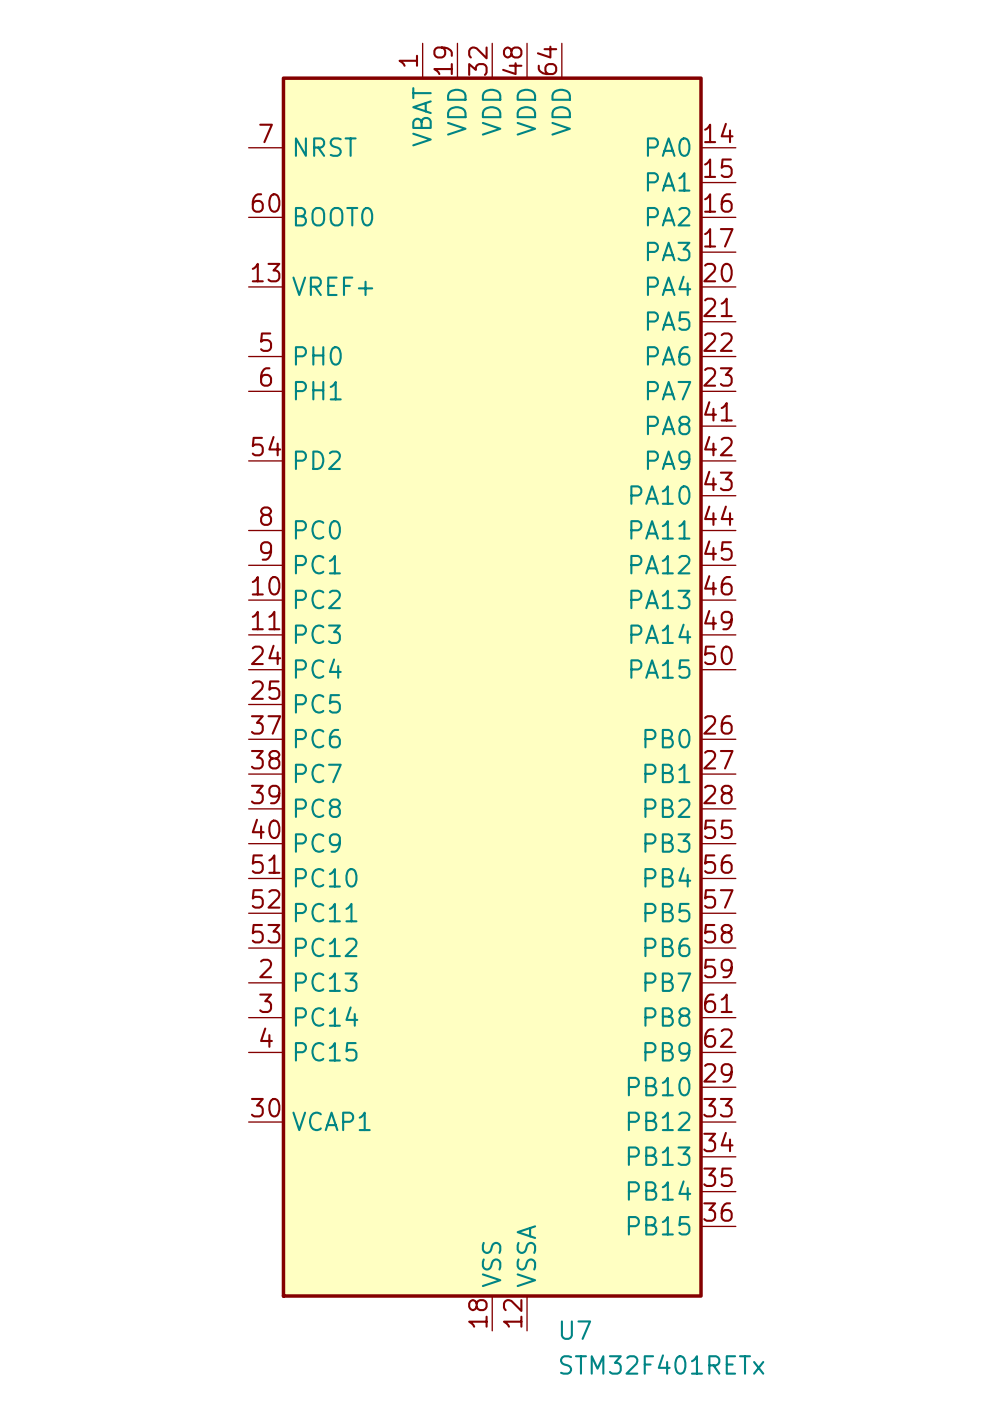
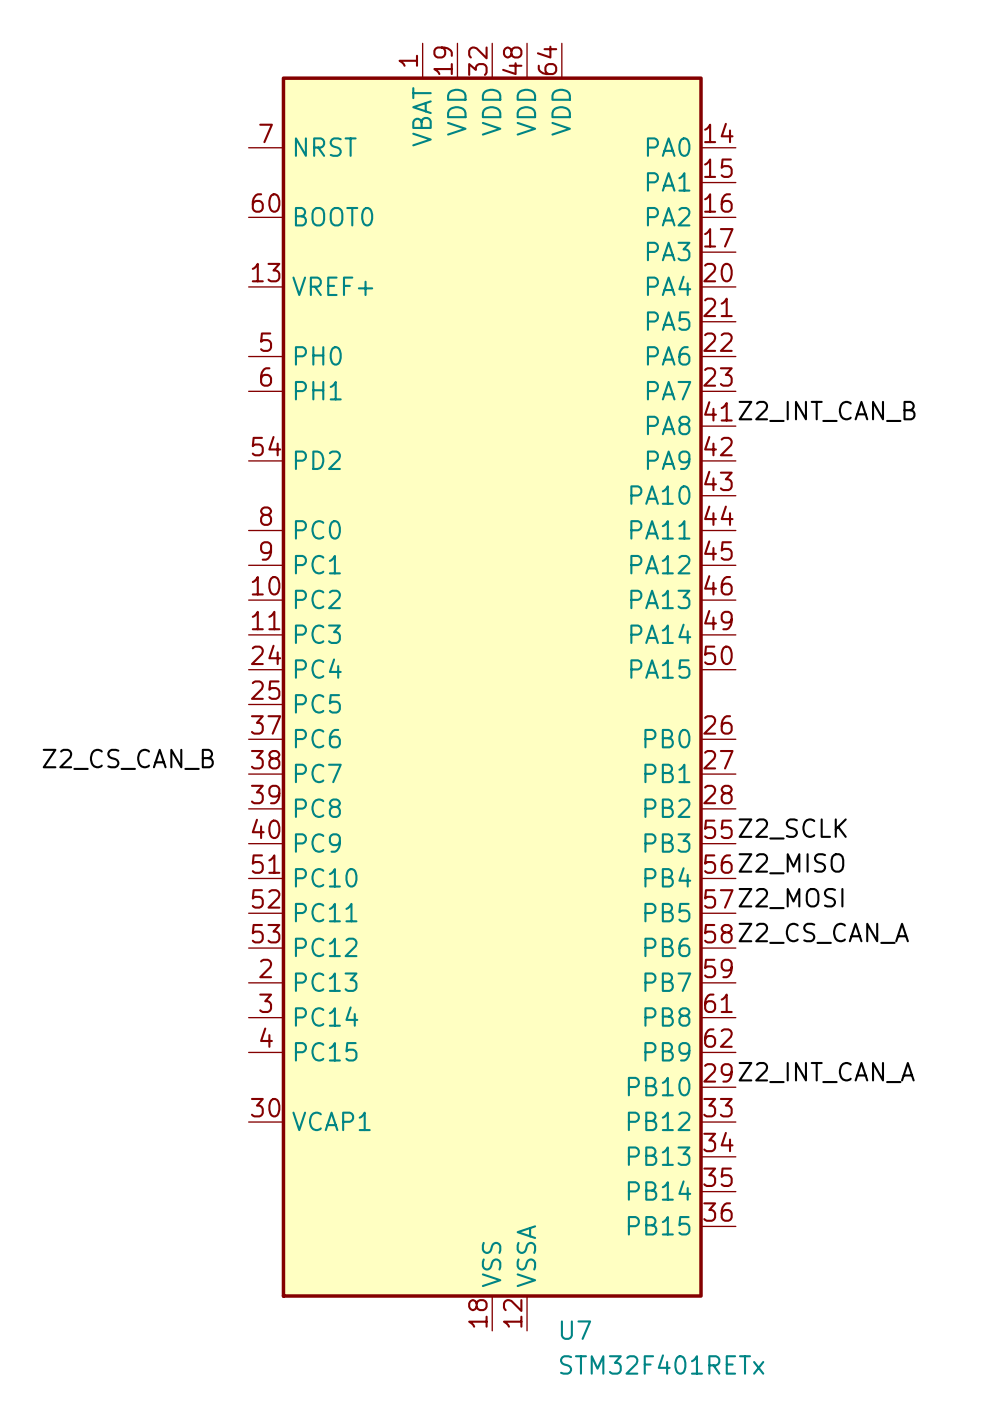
label: none -> Z2_INT_CAN_B (827, 411)
label: none -> Z2_CS_CAN_B (128, 759)
label: none -> Z2_SCLK (792, 828)
label: none -> Z2_MISO (791, 863)
label: none -> Z2_MOSI (791, 898)
label: none -> Z2_CS_CAN_A (823, 933)
label: none -> Z2_INT_CAN_A (826, 1072)

